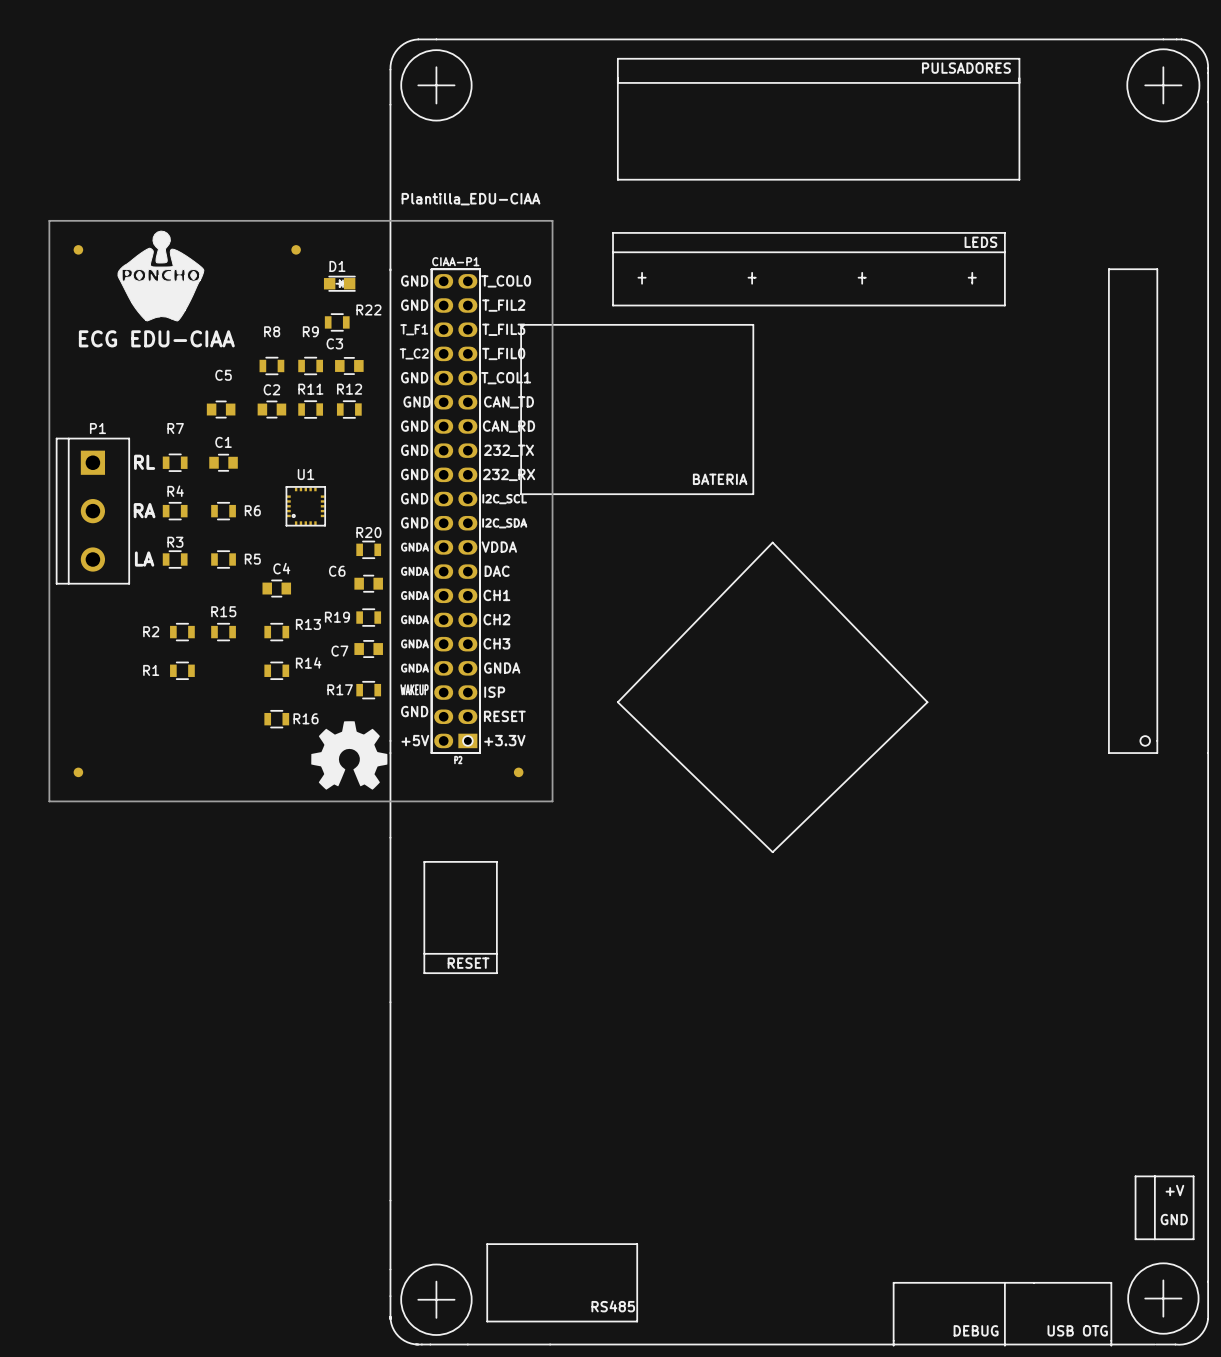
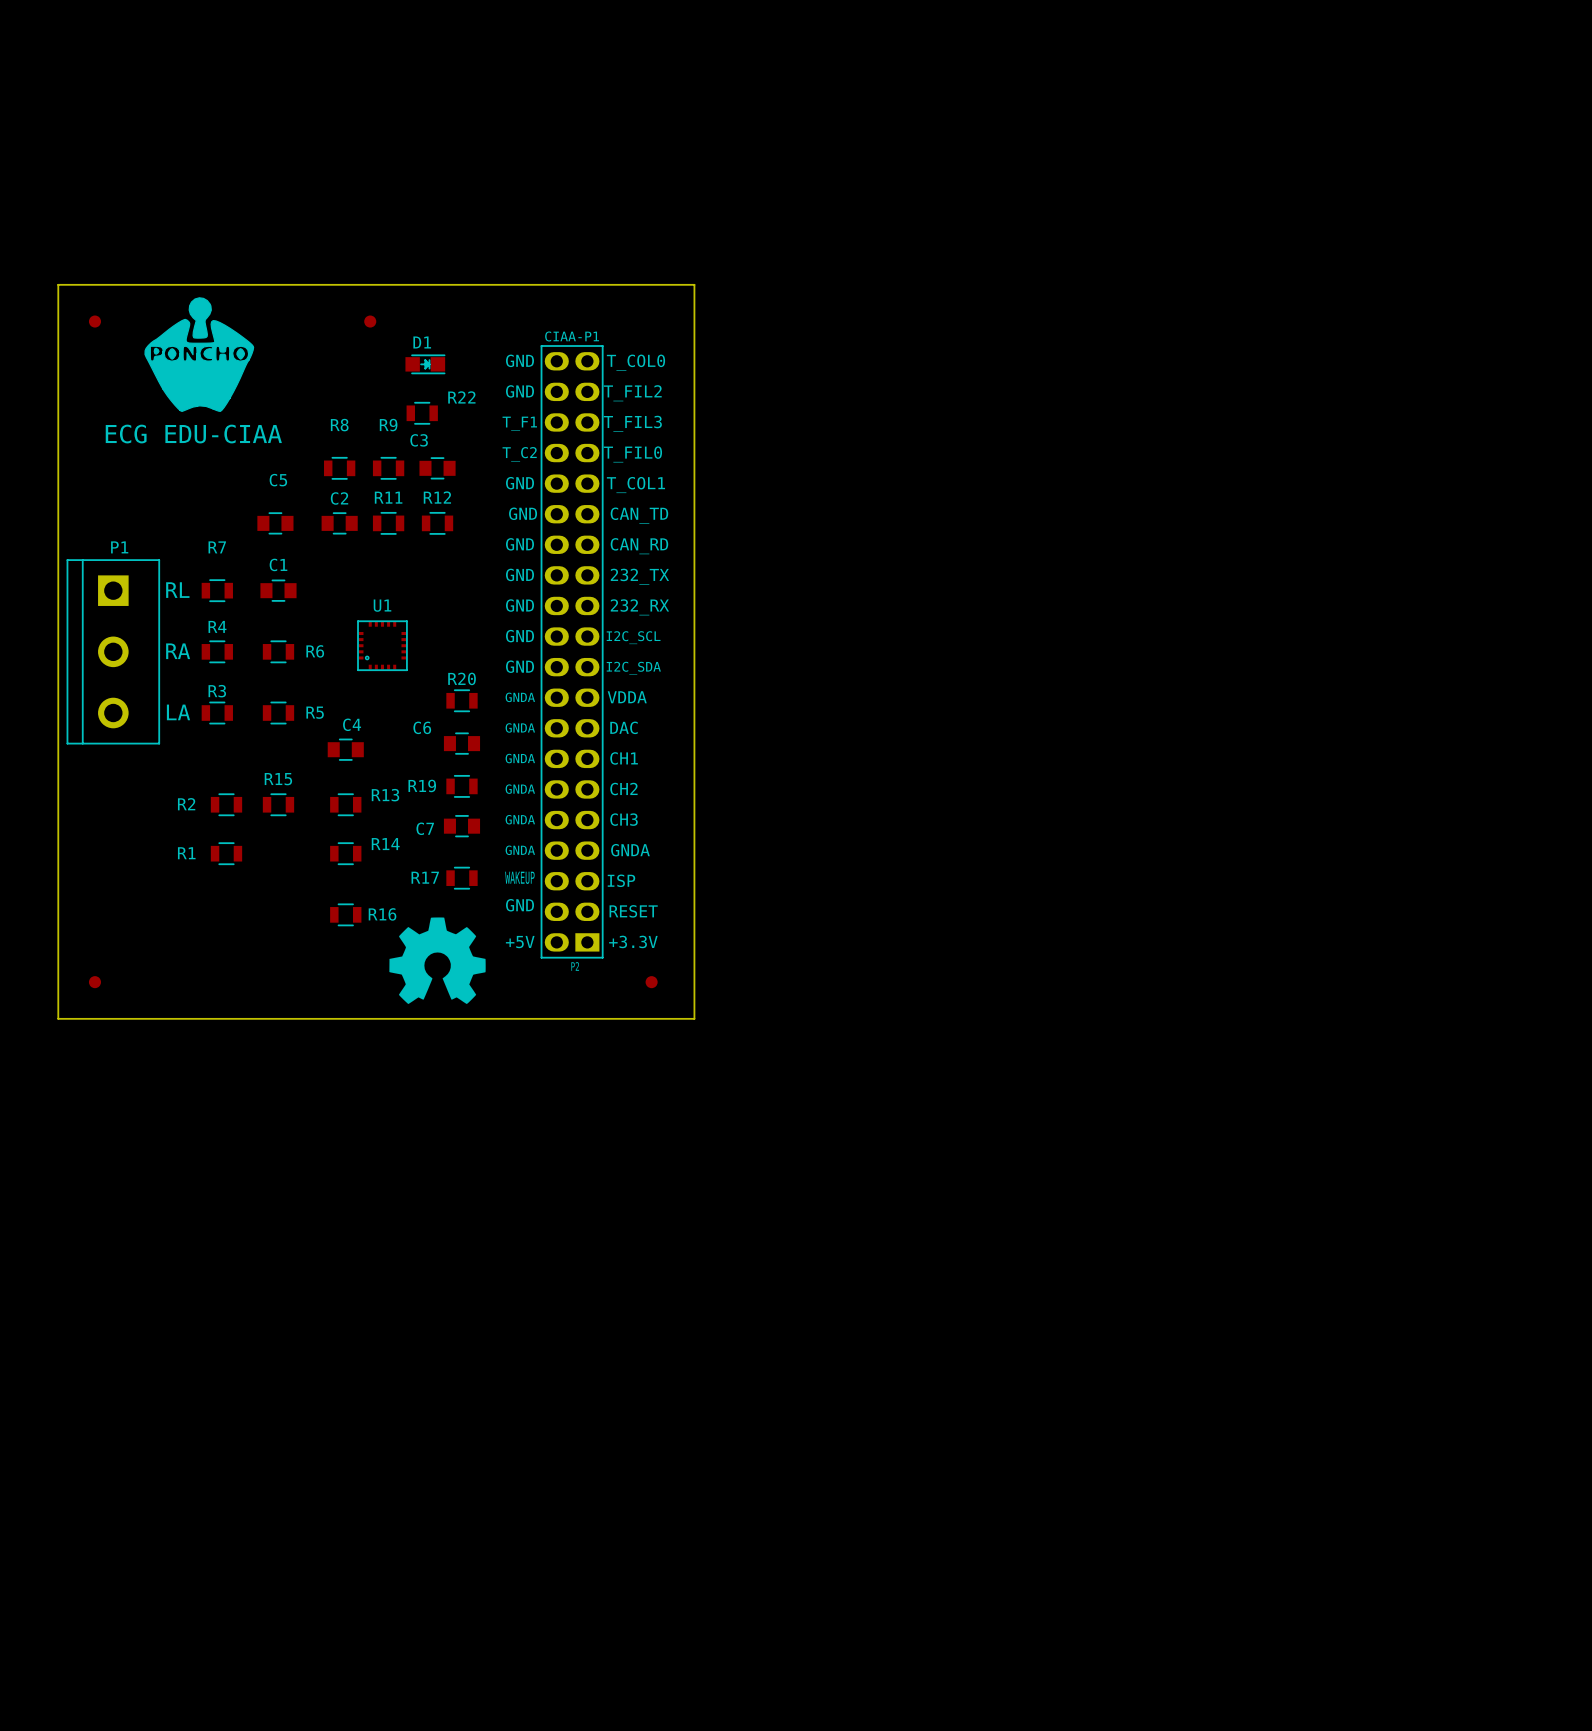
drawing: [389, 38, 1209, 1347] -> none

